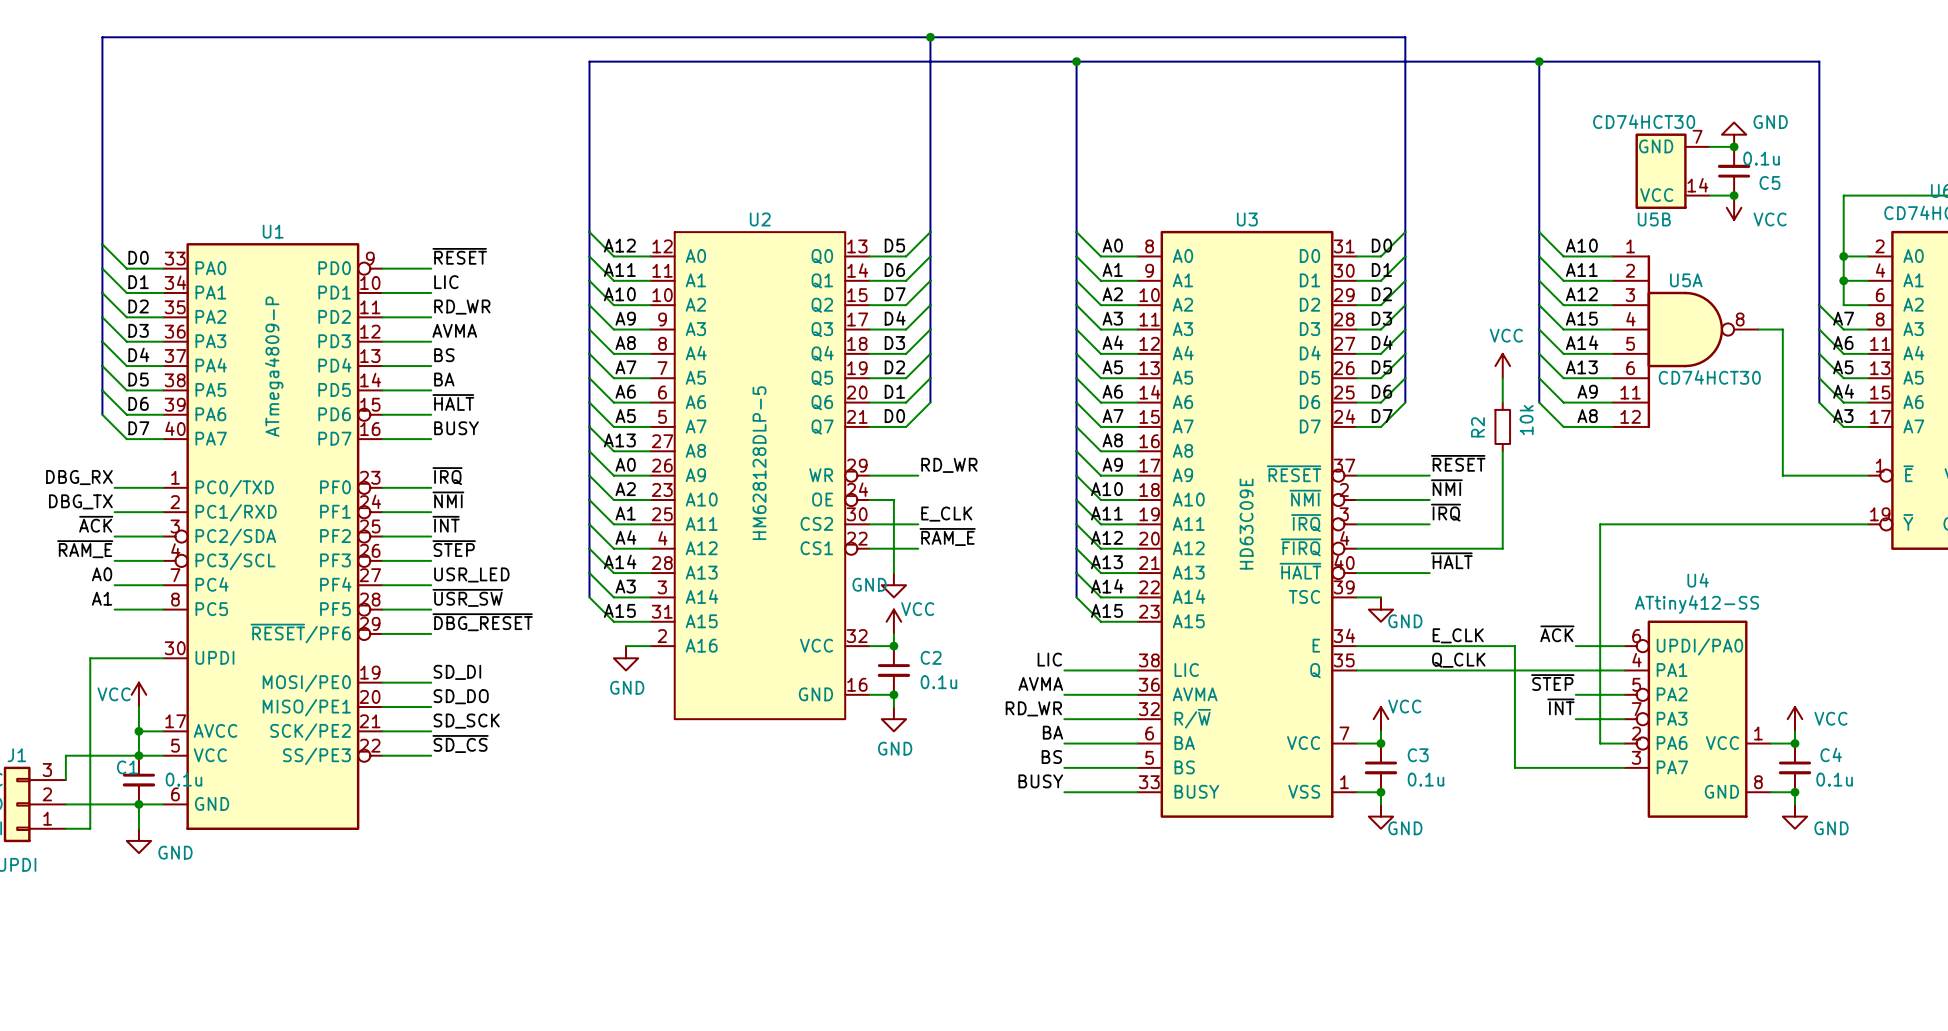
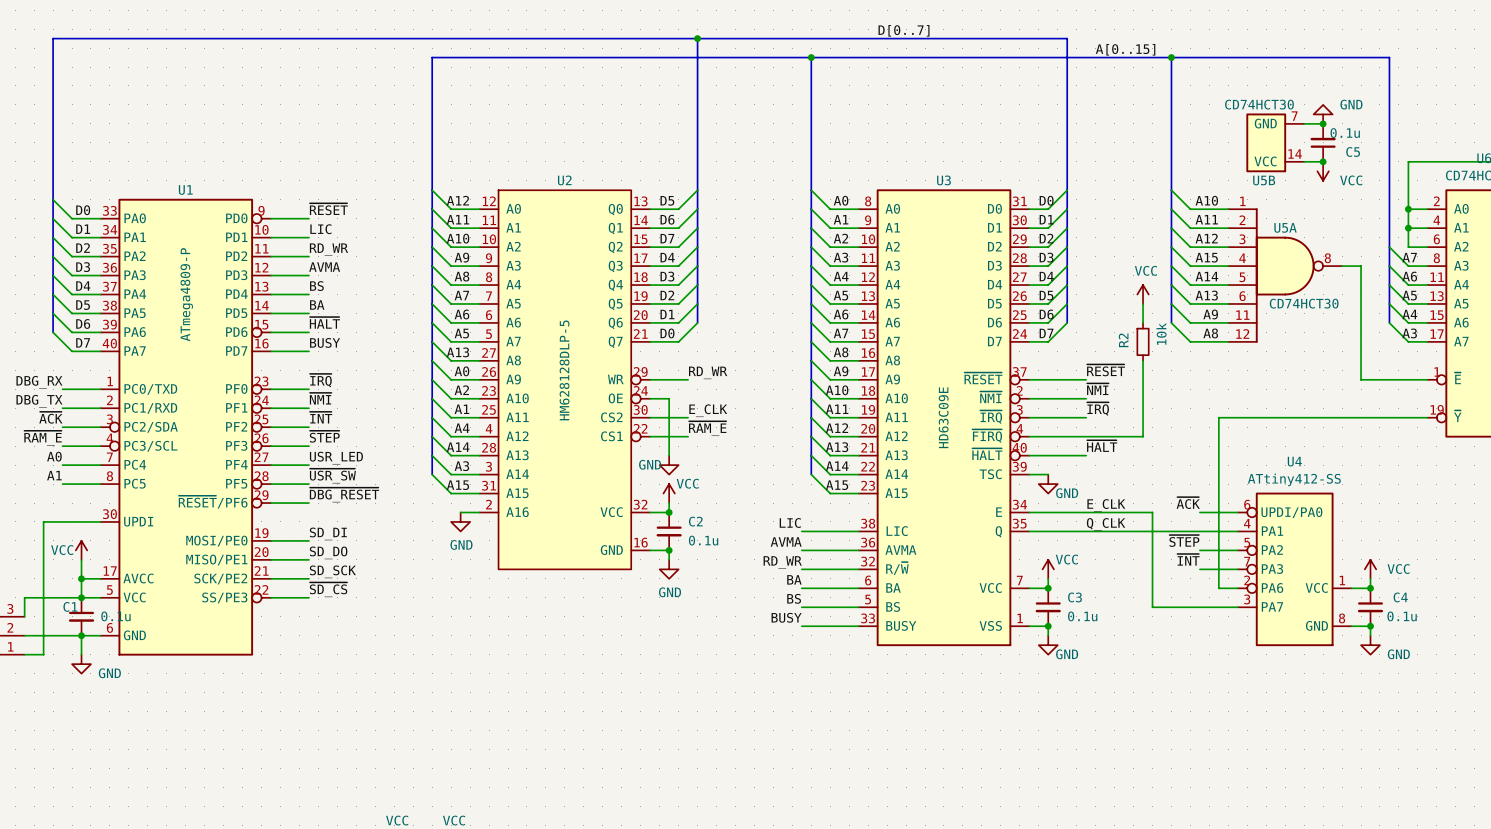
label: none -> D[0..7] (904, 30)
label: none -> A[0..15] (1125, 49)

